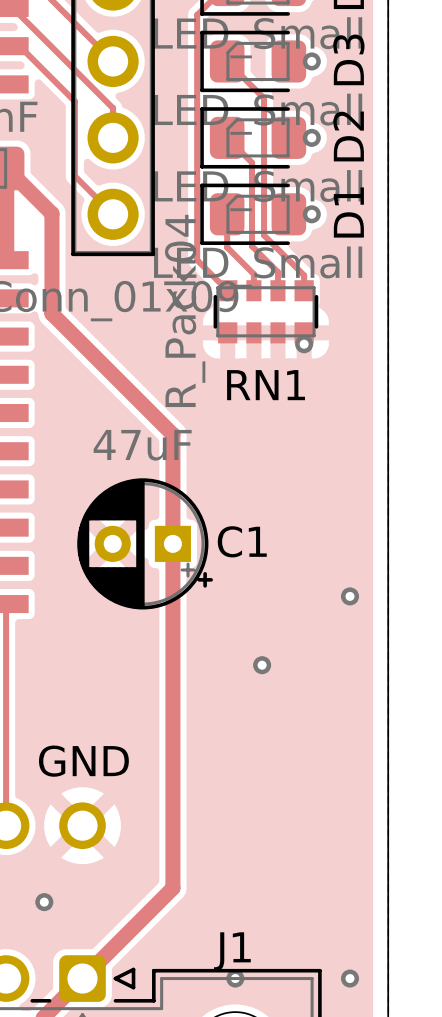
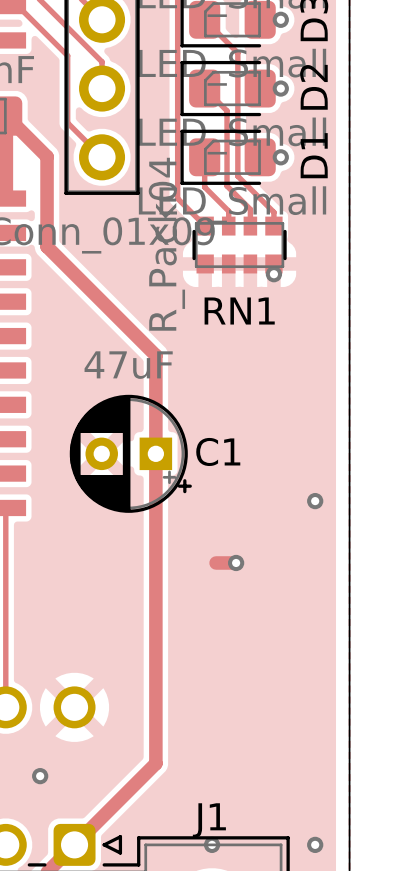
track: none -> (216, 562) (236, 562)
text: GND (83, 761) -> none

